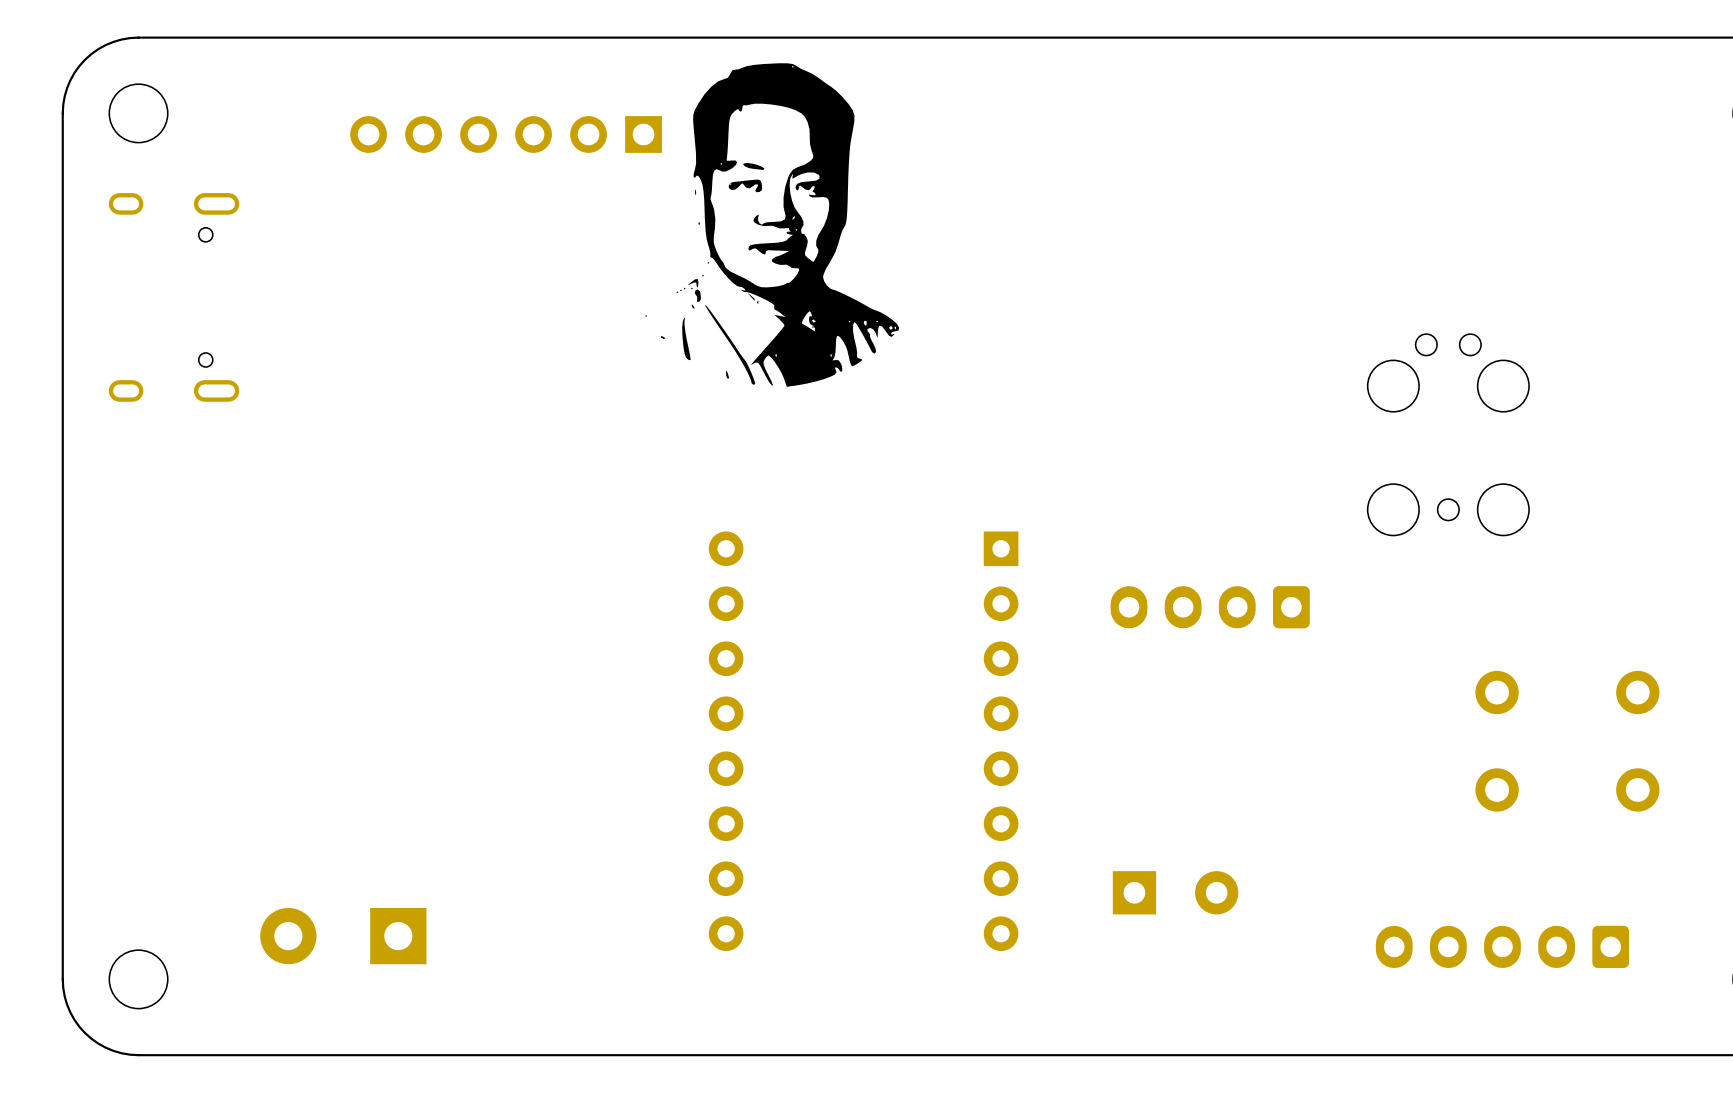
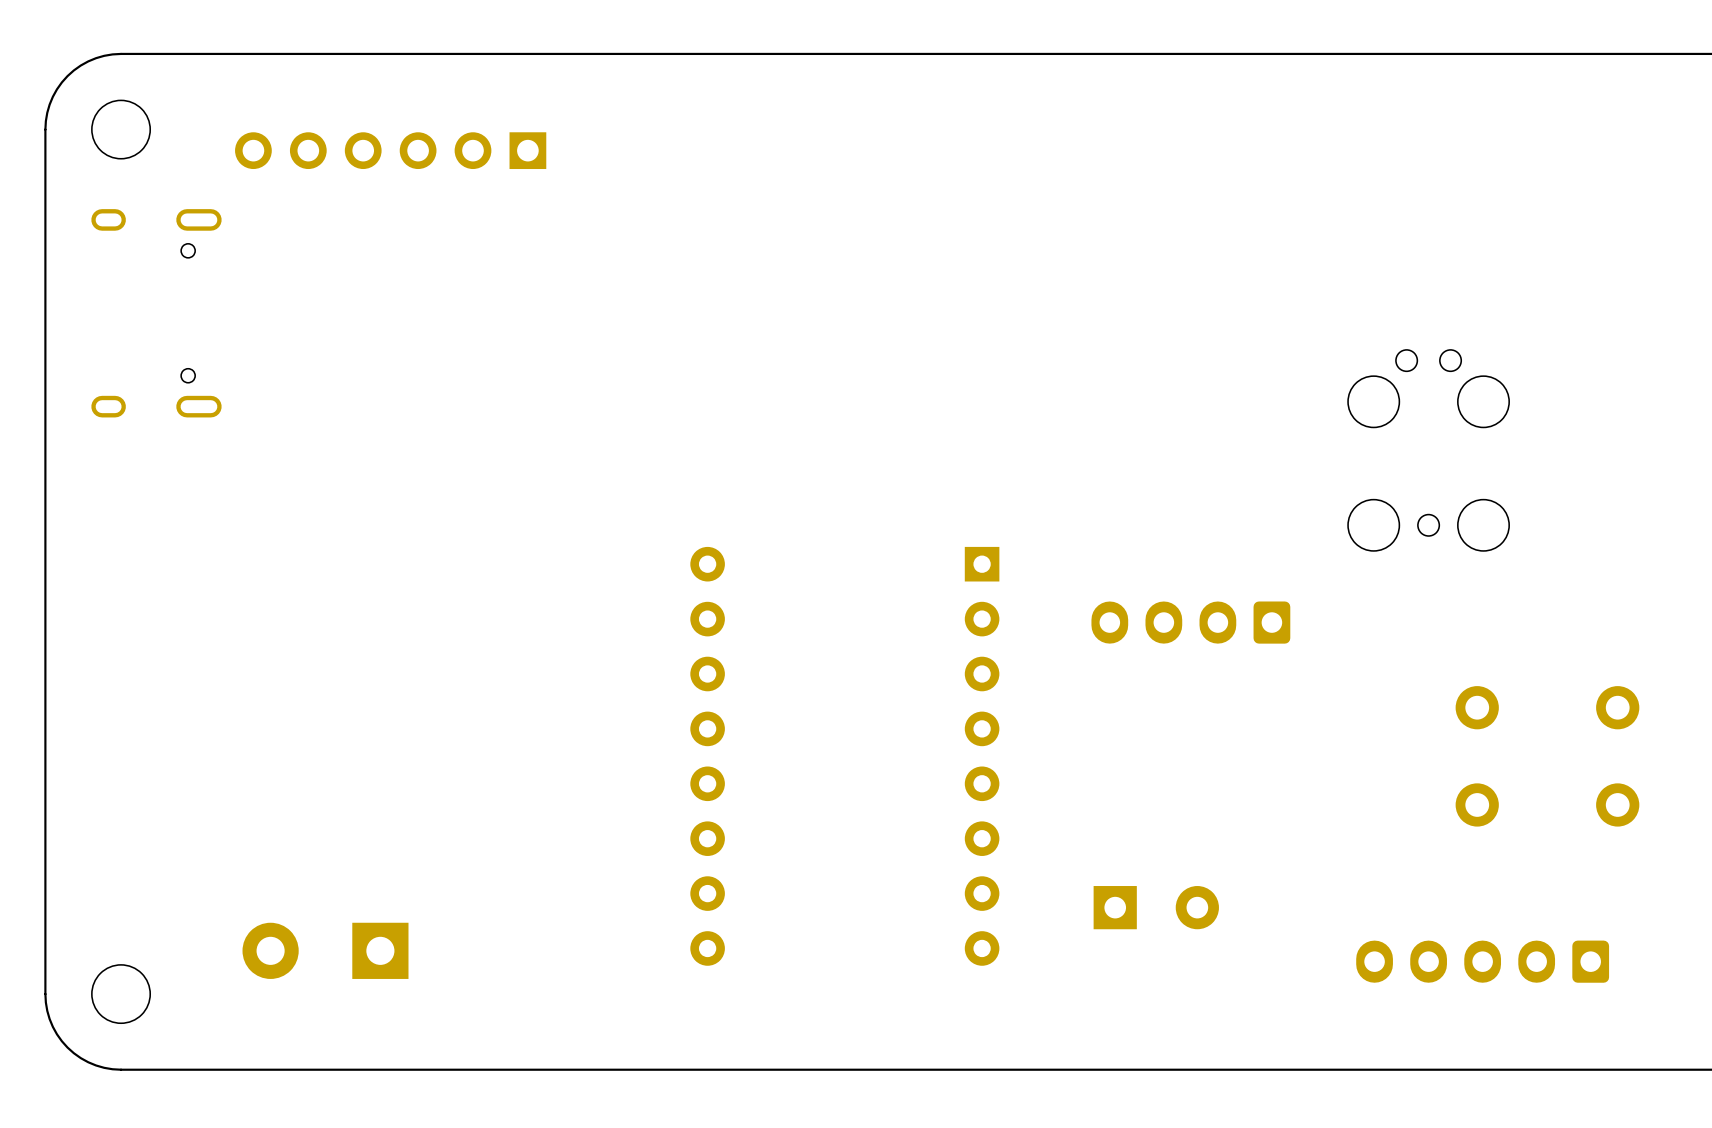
drawing: [645, 63, 900, 387] -> none
part position: (506, 134) -> (390, 150)

